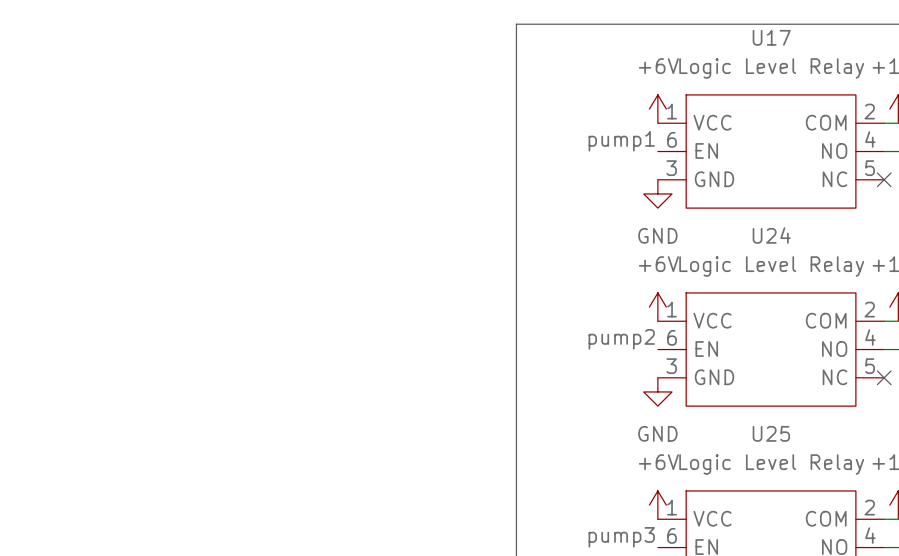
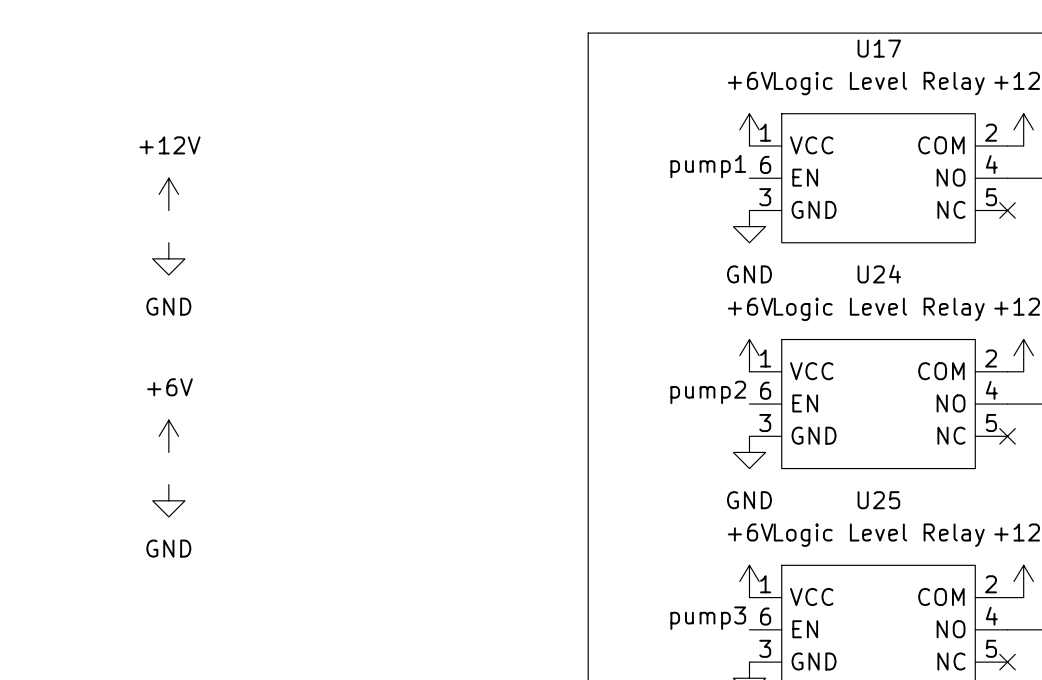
power symbol: none -> +12V (168, 194)
power symbol: none -> GND (168, 258)
power symbol: none -> +6V (168, 436)
power symbol: none -> GND (168, 500)

